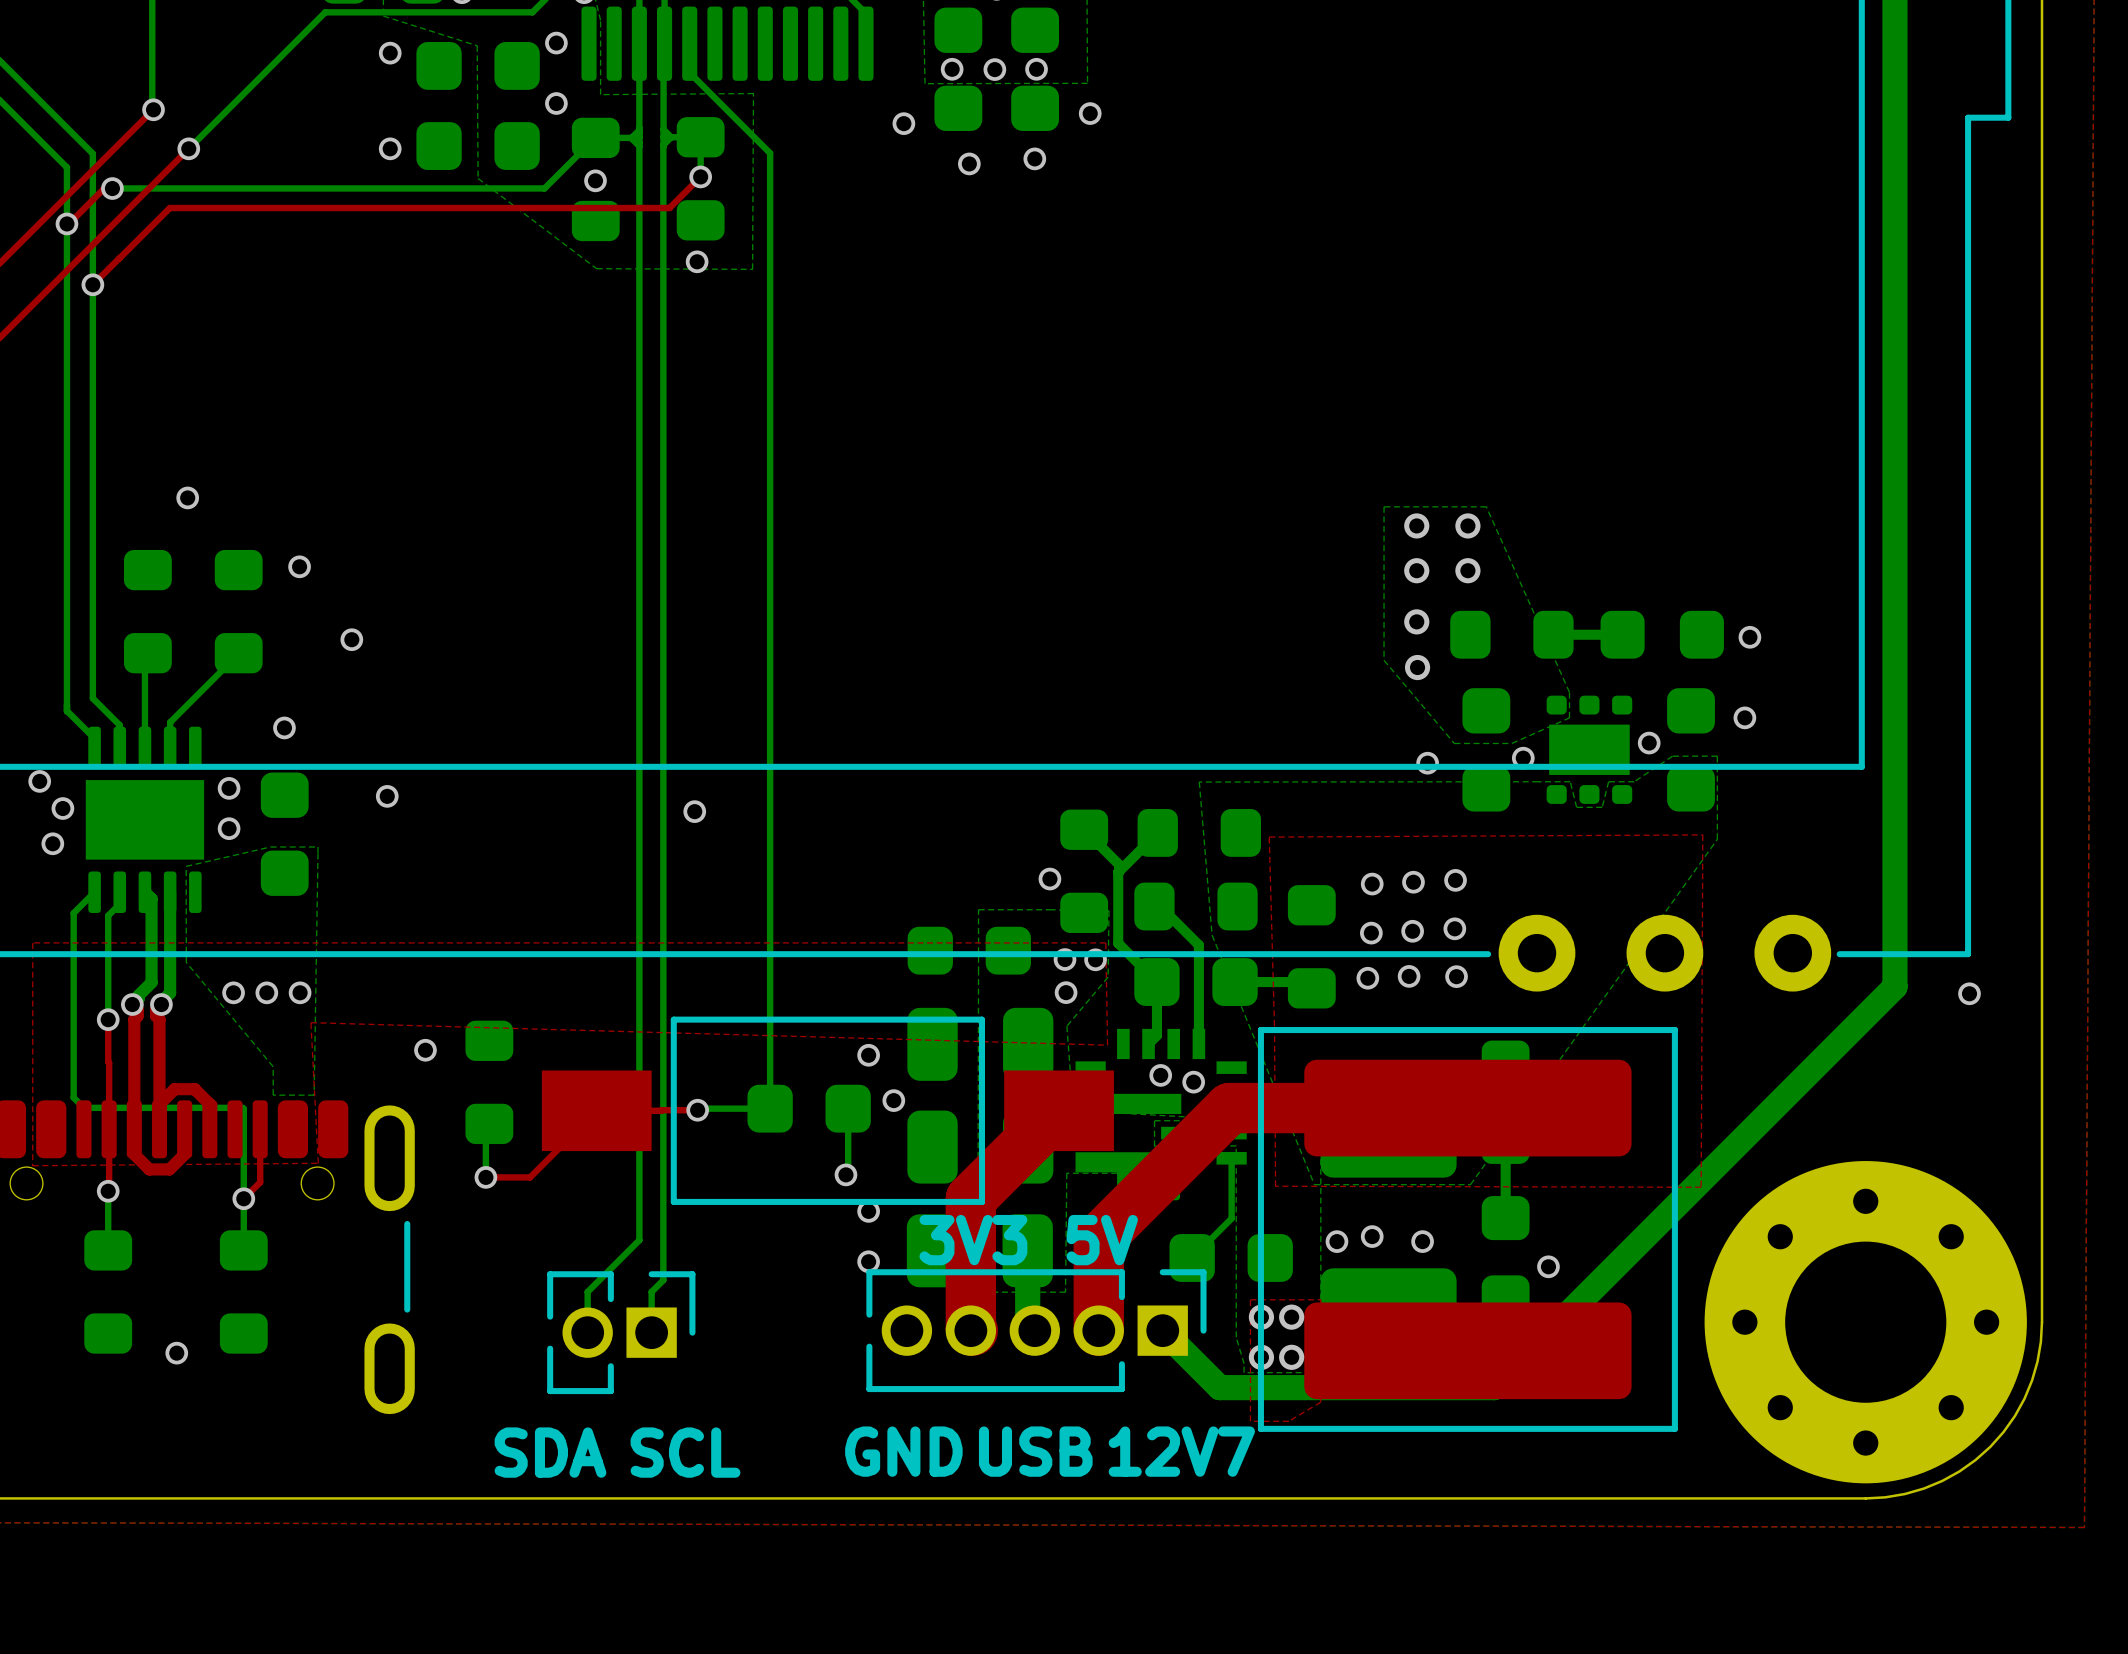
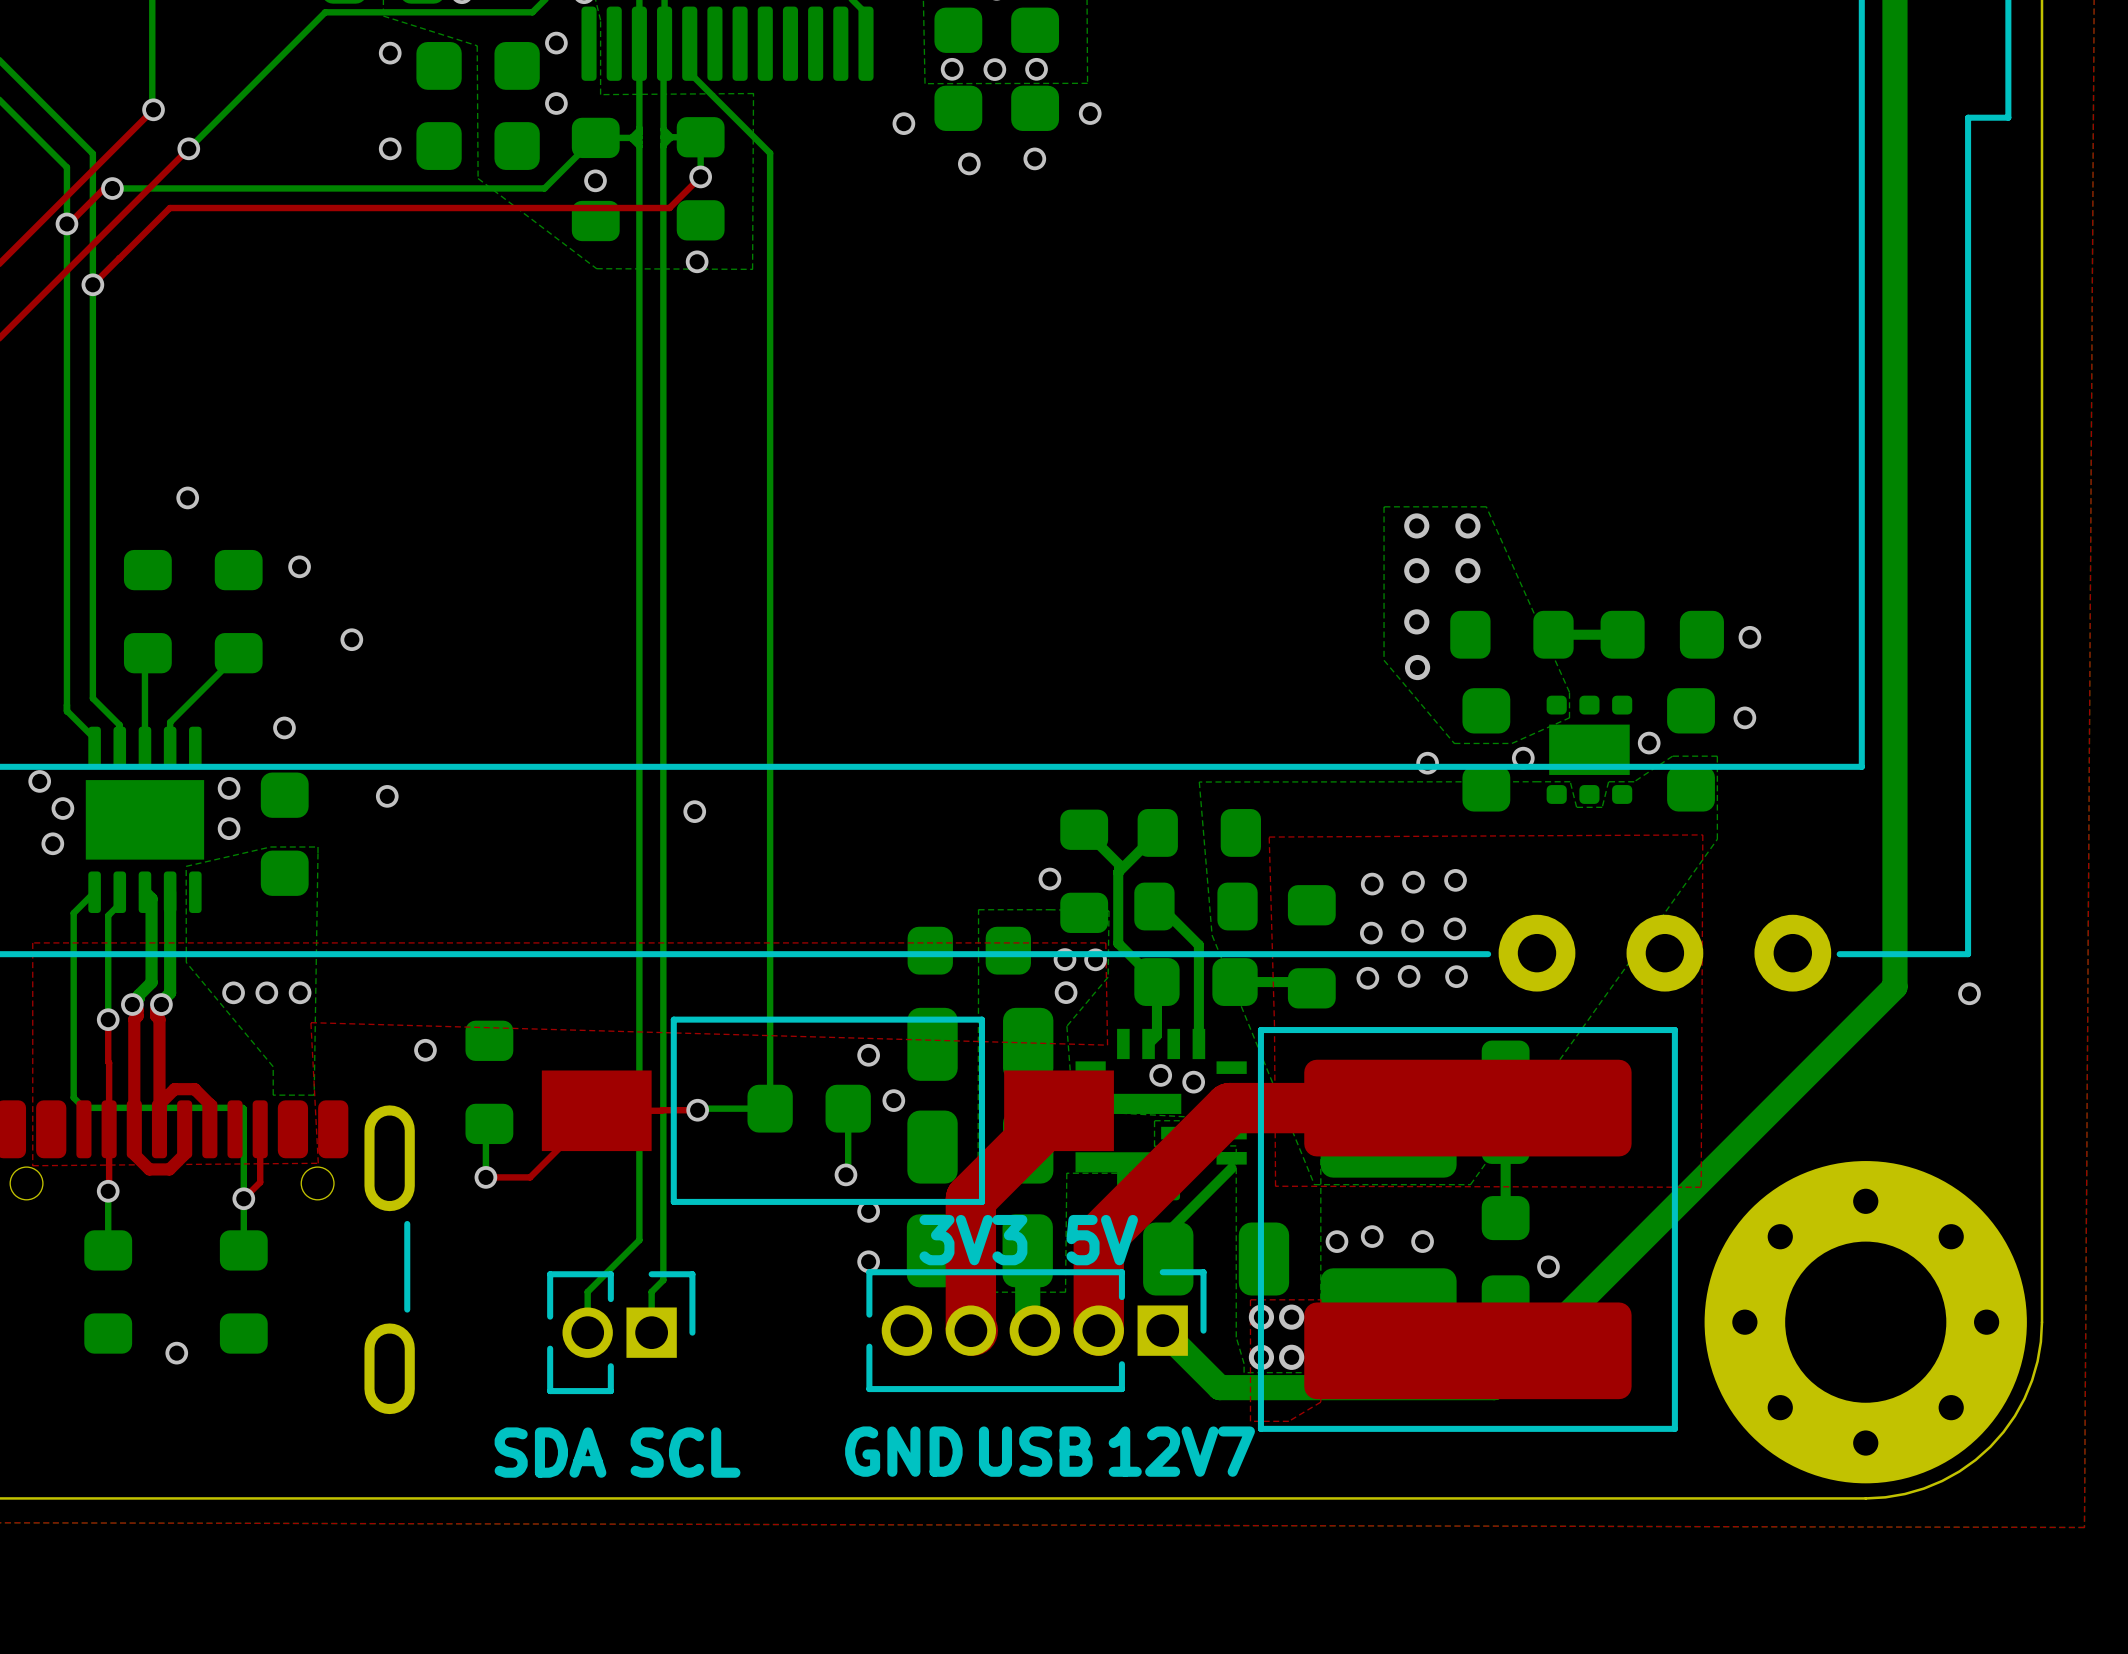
bottom track: (1231, 1168) (1231, 1218) (1192, 1257) -> (1231, 1168) (1168, 1231) (1168, 1259)
part footprint: [1169, 1234, 1293, 1282] -> [1143, 1222, 1290, 1296]

